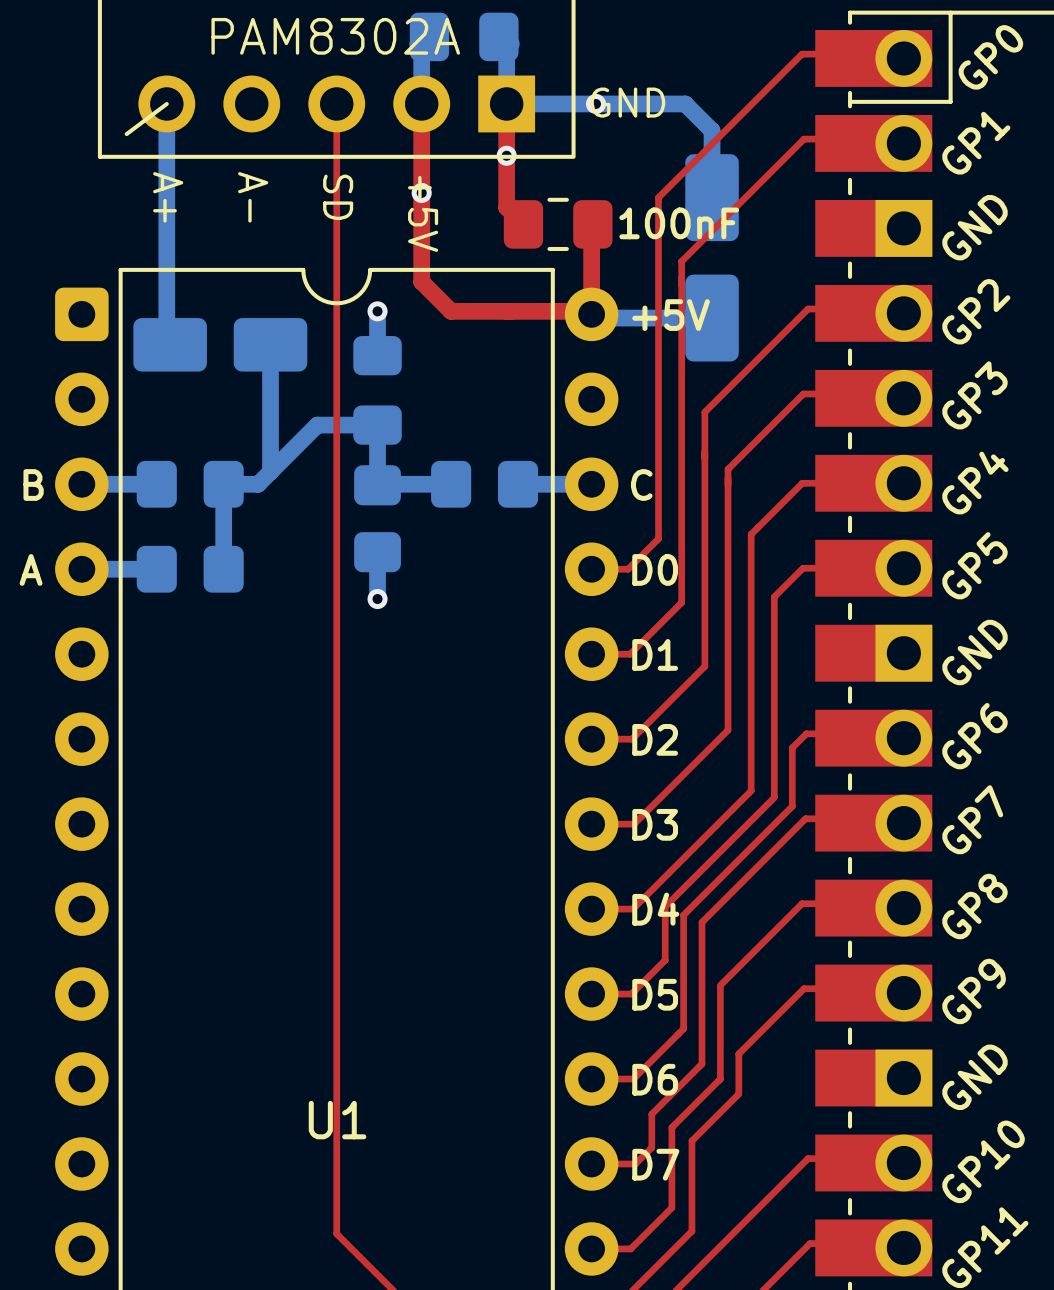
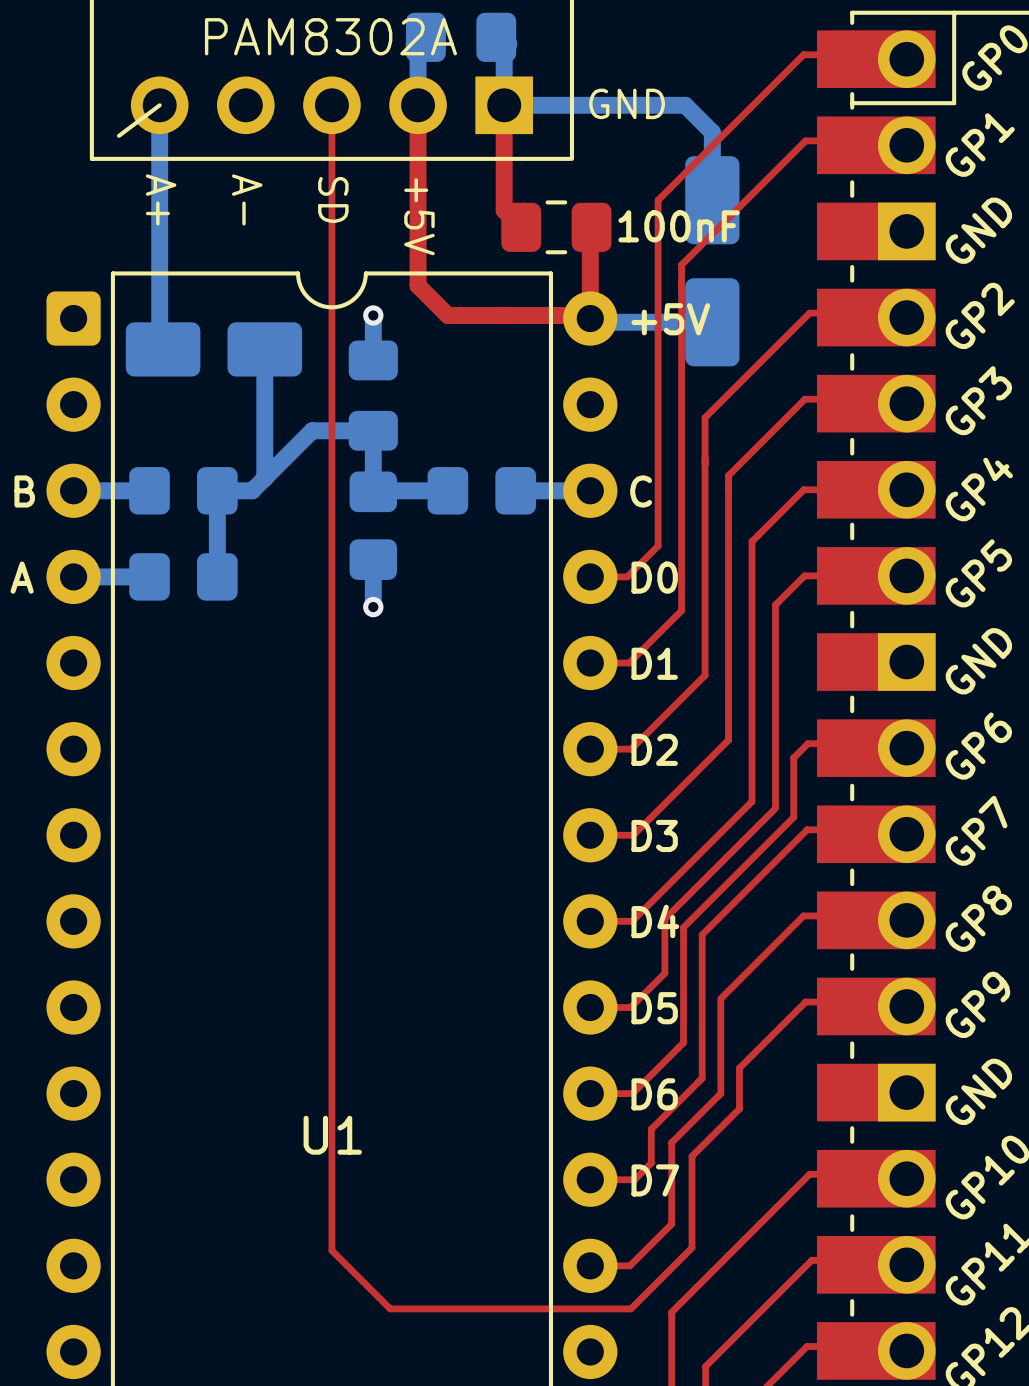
via: (595, 103) -> none
via: (506, 155) -> none
via: (421, 192) -> none

